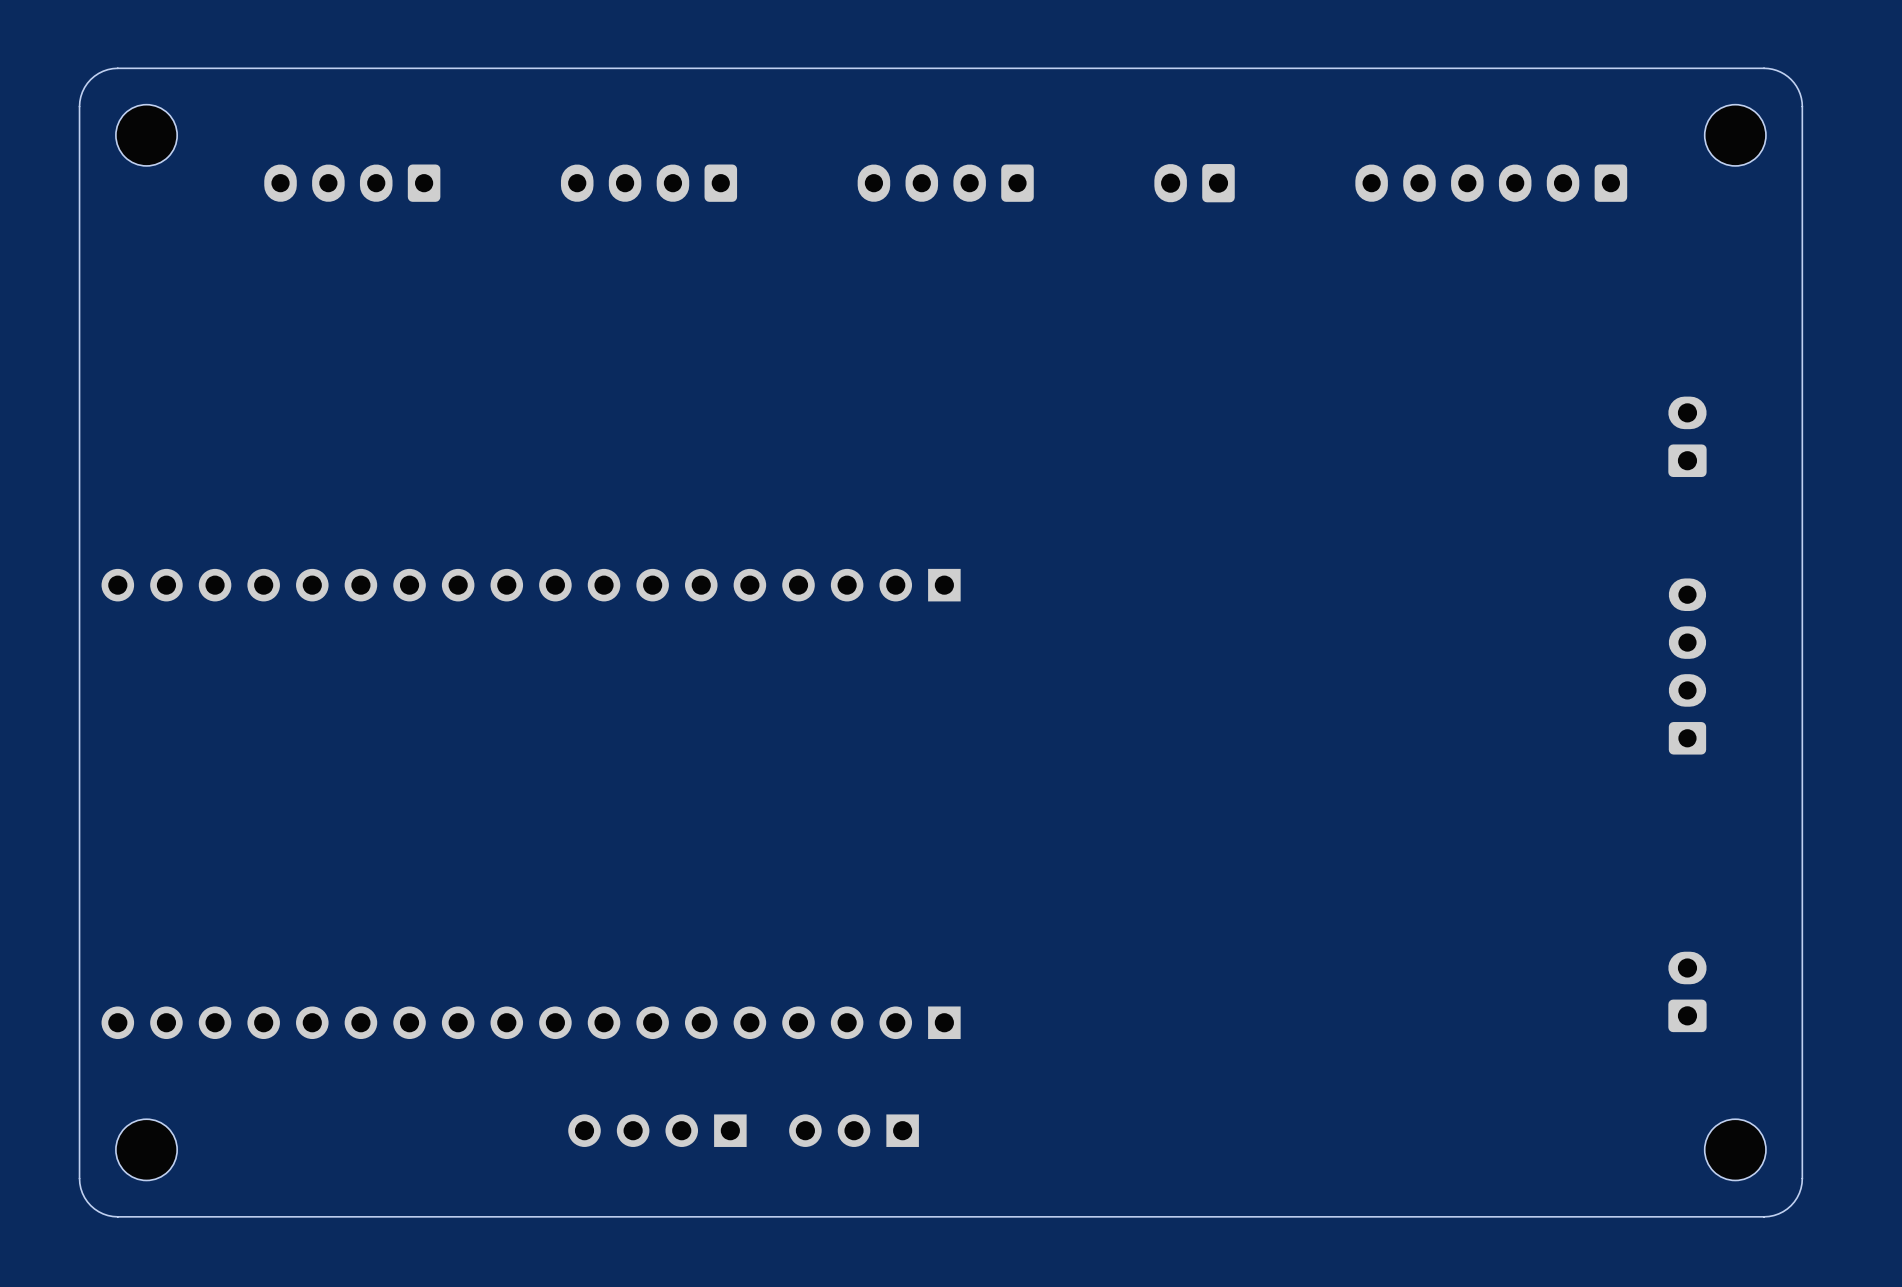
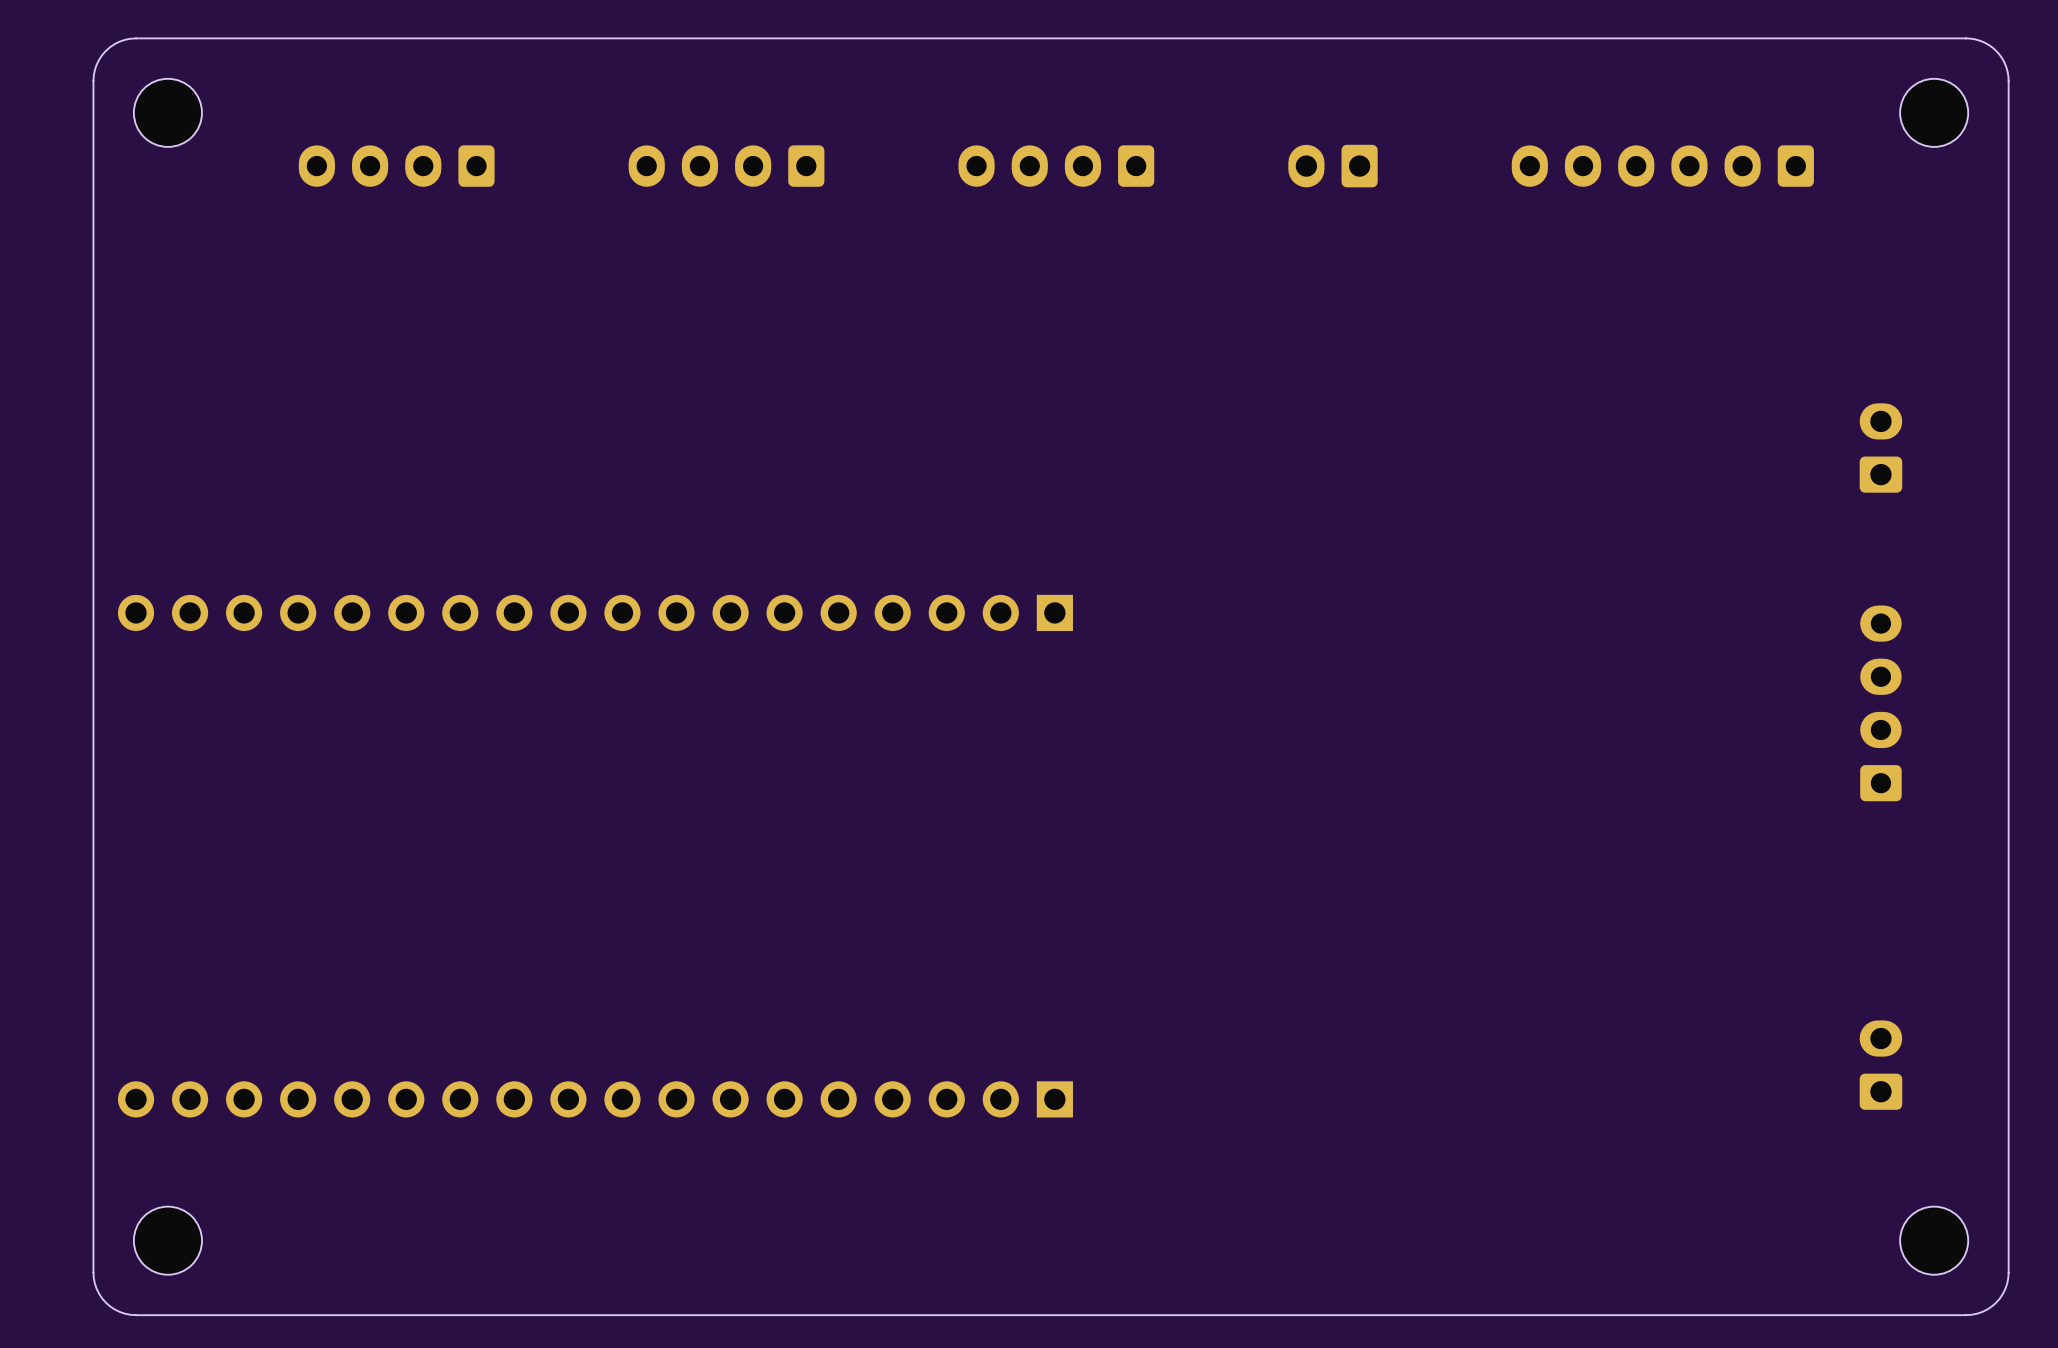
part: (657, 1130) -> none
part: (854, 1130) -> none

